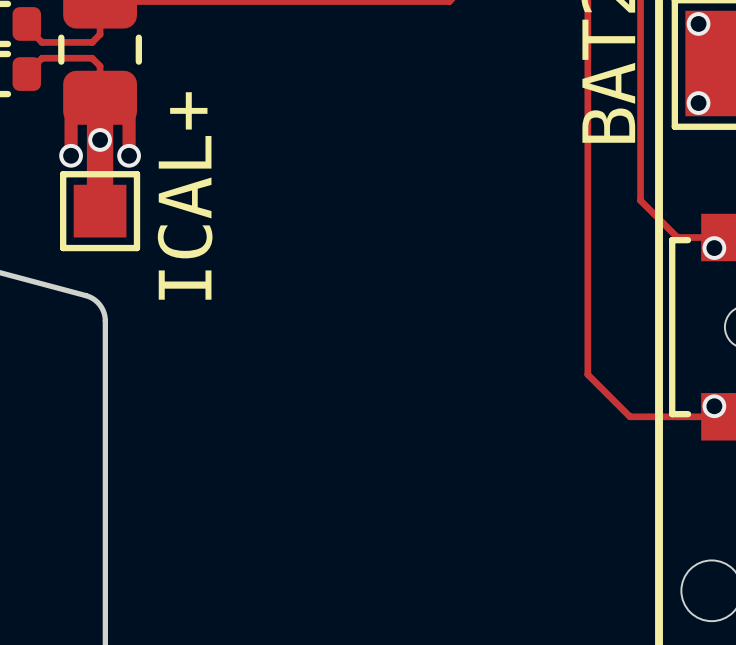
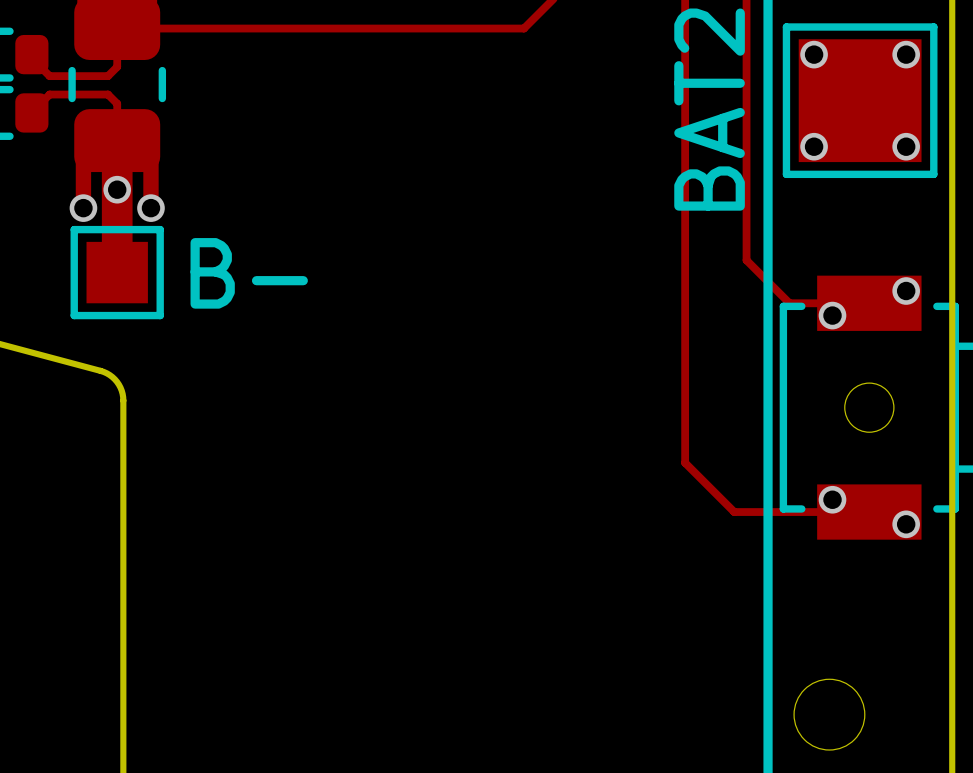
text: ICAL+ (185, 195) -> B- (249, 273)

